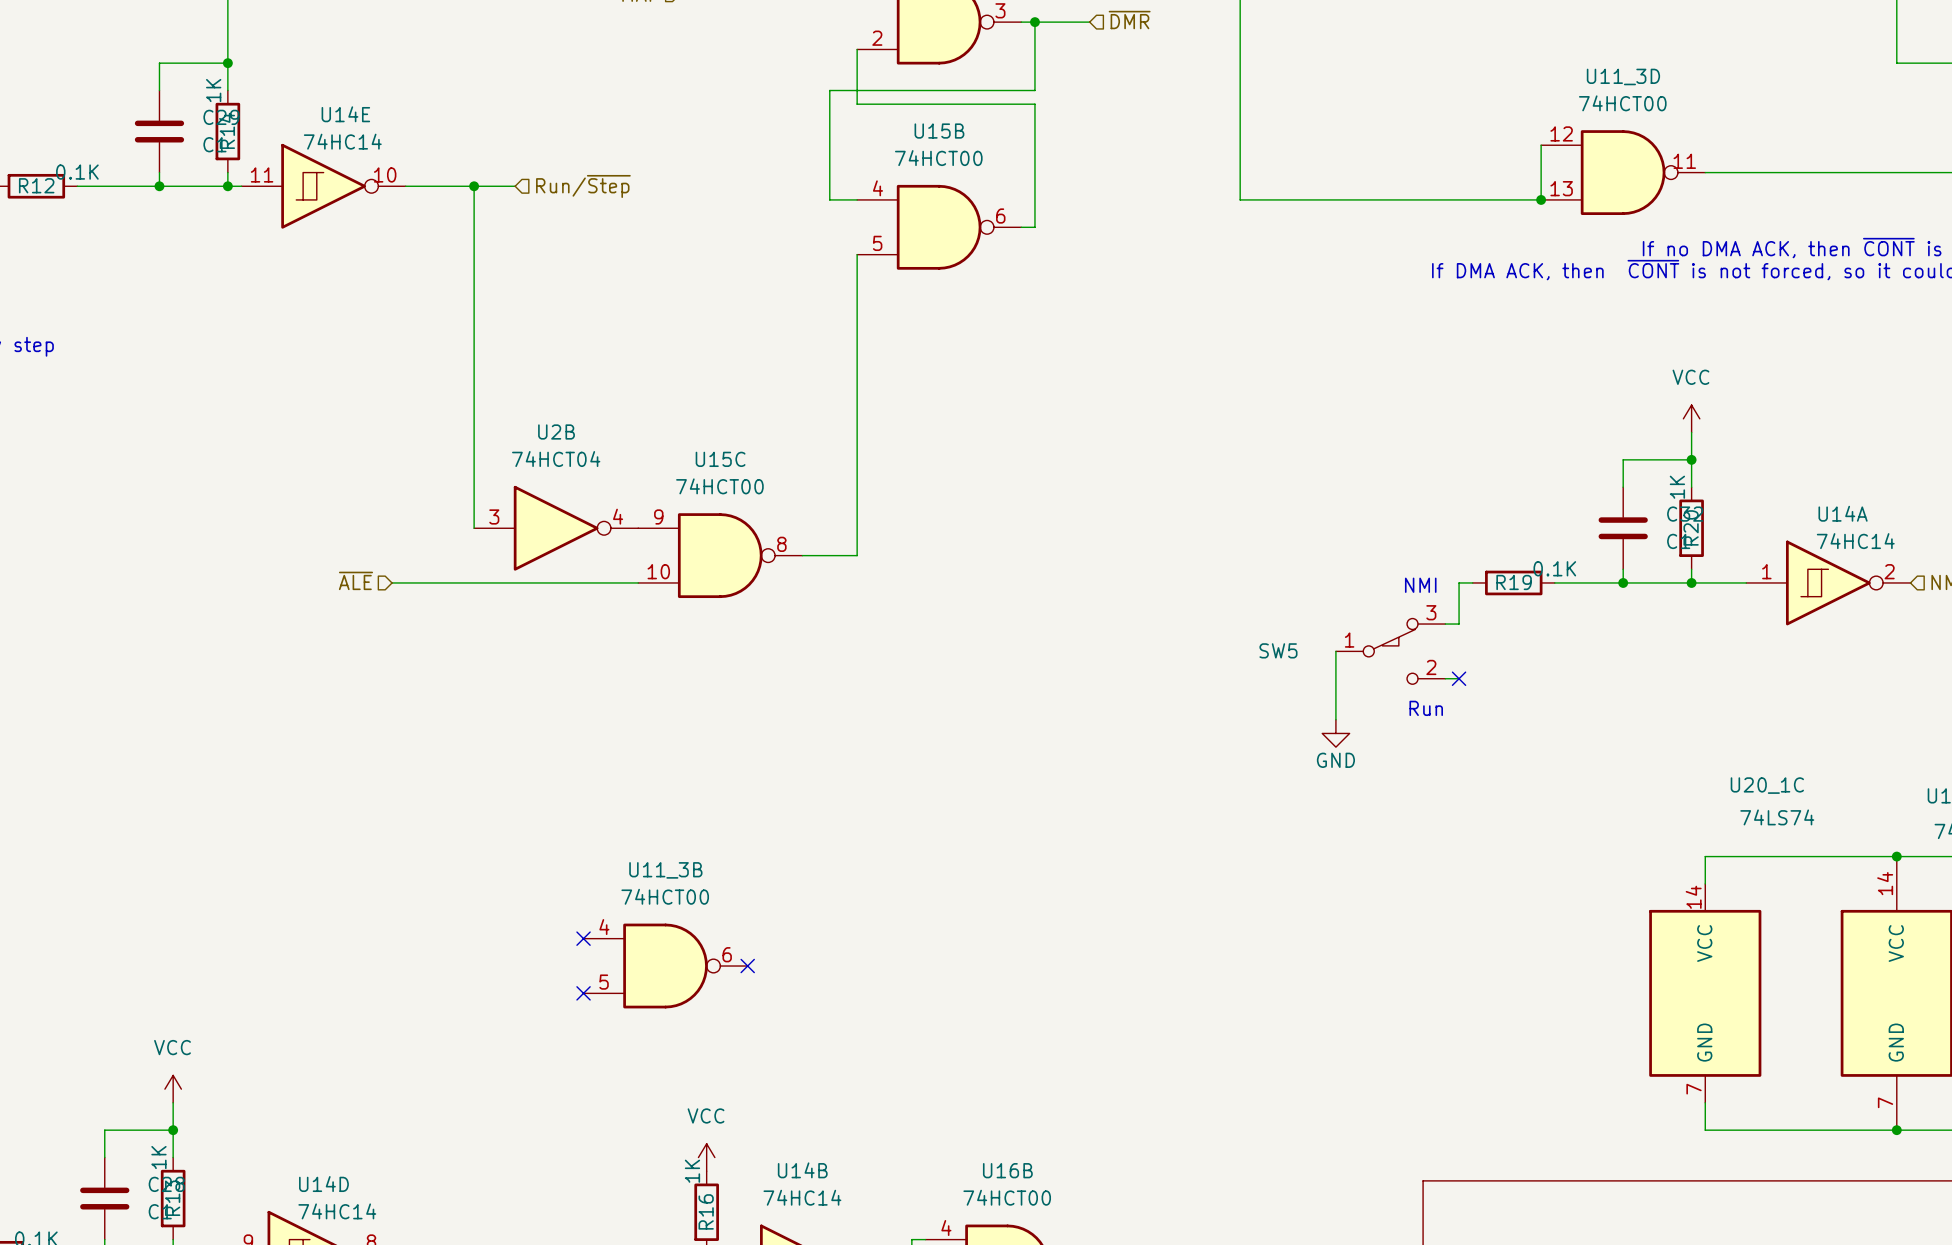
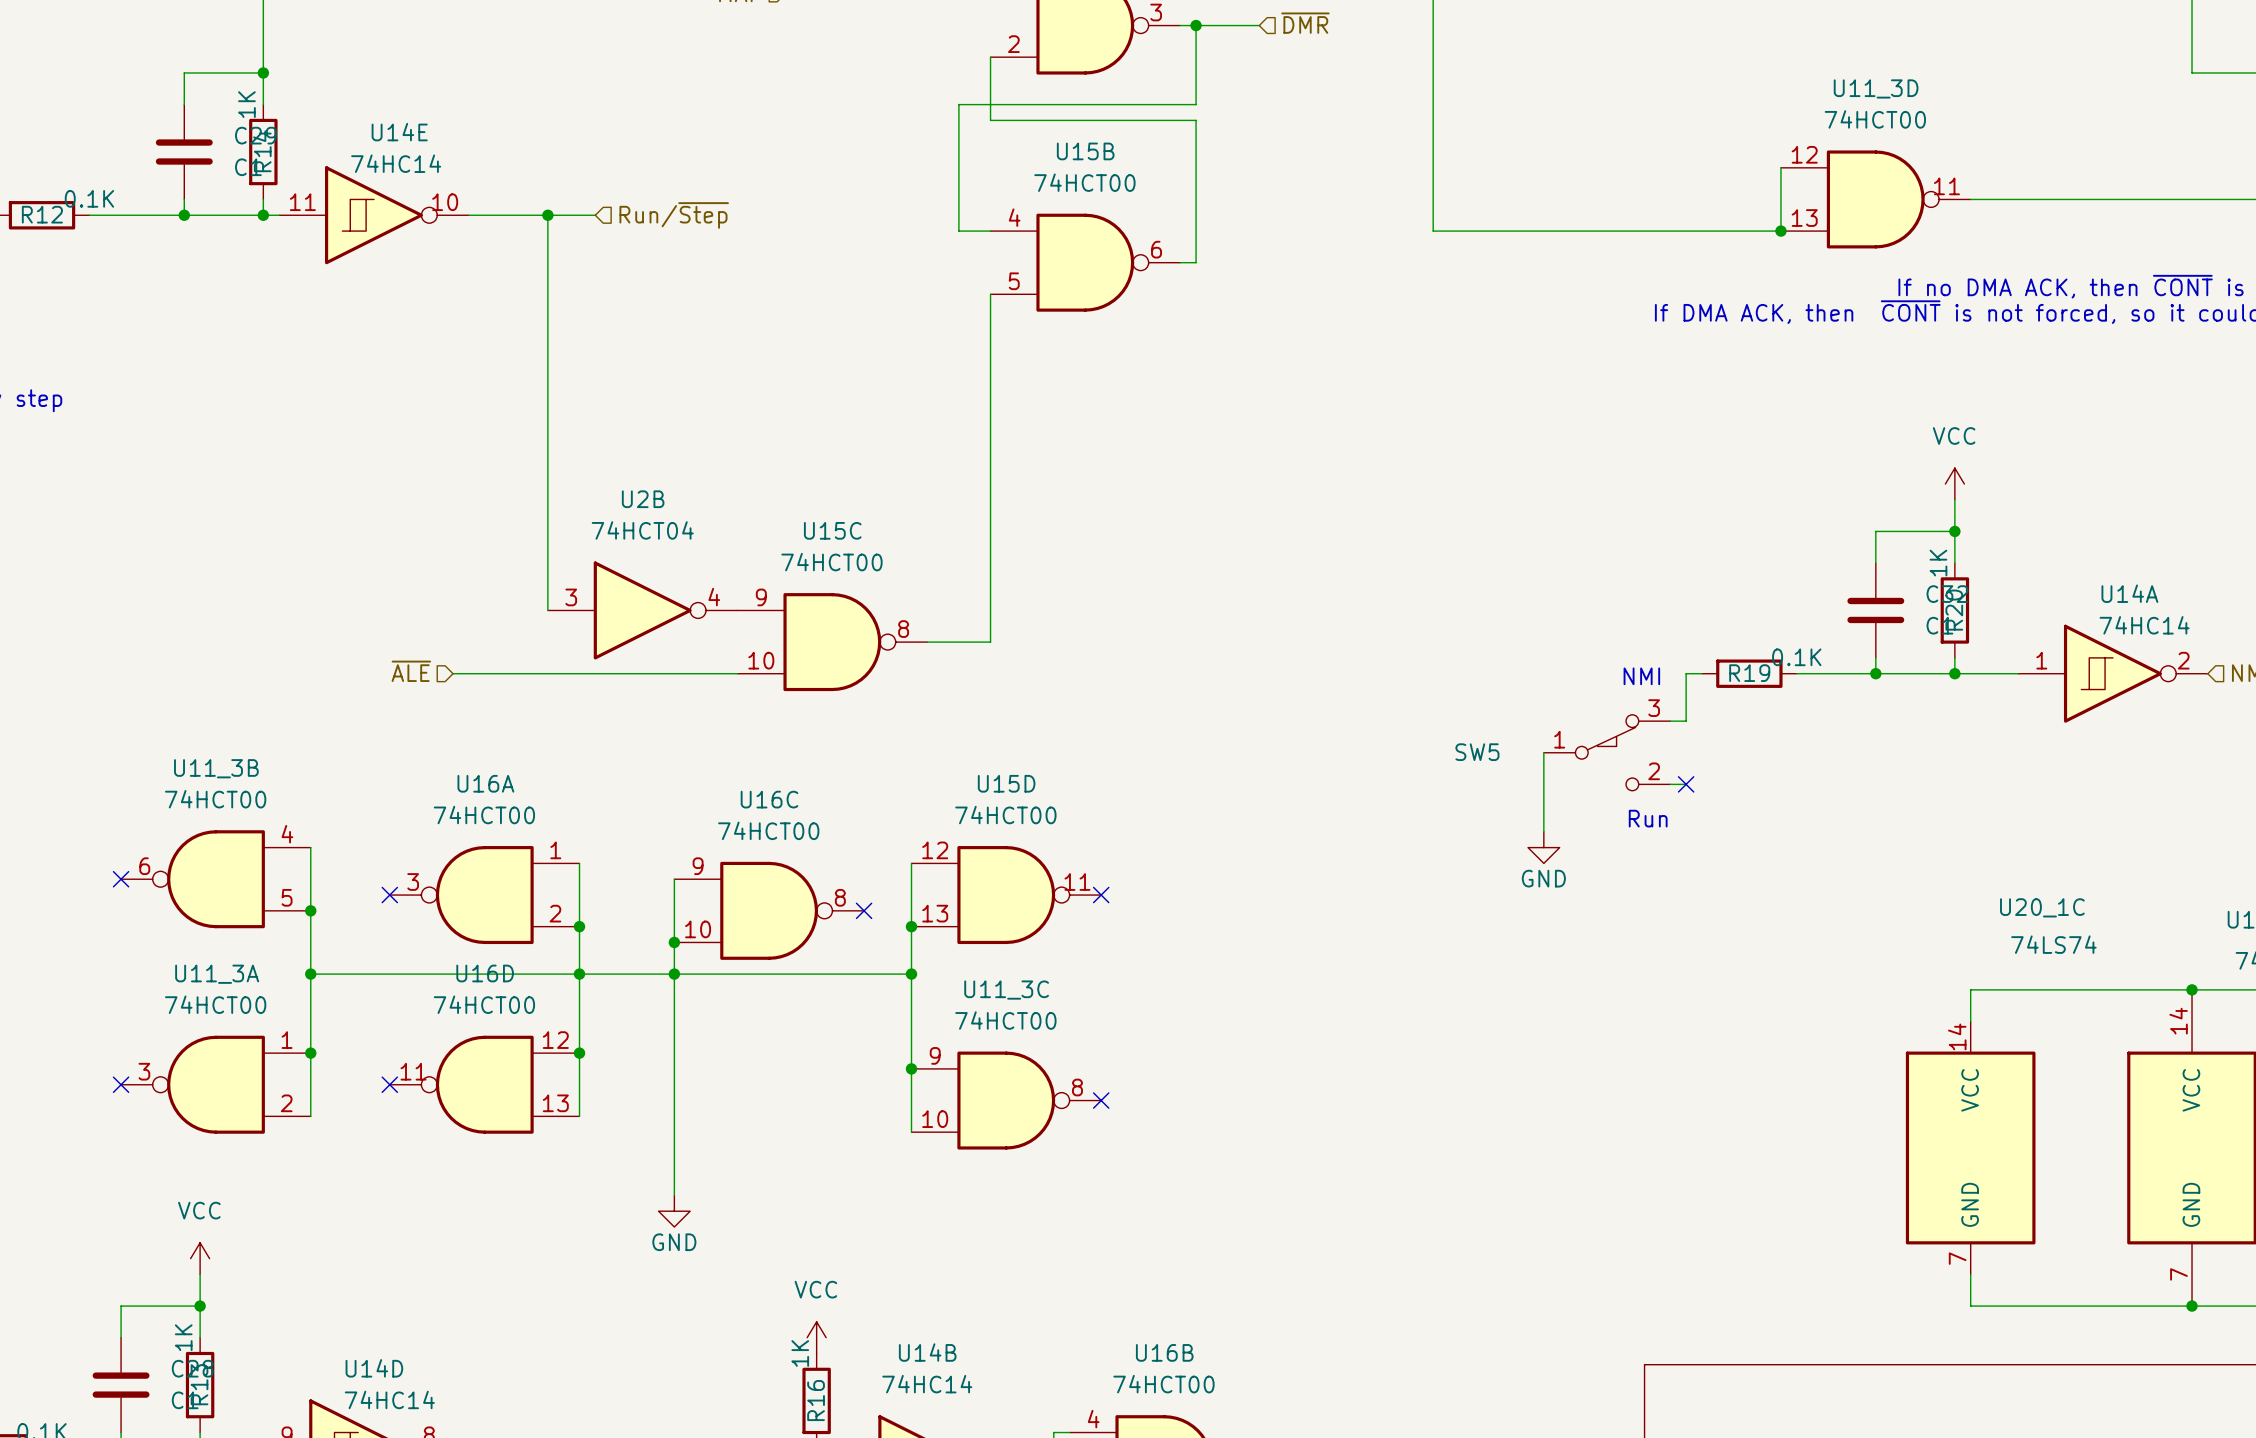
wire: none -> (310, 847) (310, 1116)
wire: none -> (579, 863) (579, 1116)
wire: none -> (911, 863) (911, 1132)
no-connect mark: none -> (121, 879)
wire: none -> (674, 879) (674, 1195)
no-connect mark: none -> (389, 895)
U16A: none -> 74HCT00 (484, 895)
U15D: none -> 74HCT00 (1006, 895)
no-connect mark: none -> (1101, 895)
junction: none -> (310, 910)
U16C: none -> 74HCT00 (769, 910)
no-connect mark: none -> (864, 910)
junction: none -> (579, 926)
junction: none -> (911, 926)
junction: none -> (674, 942)
wire: none -> (310, 974) (911, 974)
junction: none -> (310, 974)
junction: none -> (579, 974)
junction: none -> (674, 974)
junction: none -> (911, 974)
junction: none -> (310, 1053)
junction: none -> (579, 1053)
junction: none -> (911, 1068)
no-connect mark: none -> (121, 1084)
U11_3A: none -> 74HCT00 (215, 1084)
no-connect mark: none -> (389, 1084)
U16D: none -> 74HCT00 (484, 1084)
no-connect mark: (583, 938) -> none
U11_3C: none -> 74HCT00 (1006, 1100)
no-connect mark: none -> (1101, 1100)
U11_3B flip: as is (665, 966) -> left-right (216, 879)
U11_3B position: (665, 966) -> (215, 879)
no-connect mark: (747, 966) -> none
no-connect mark: (583, 993) -> none
power symbol: none -> GND (674, 1211)

